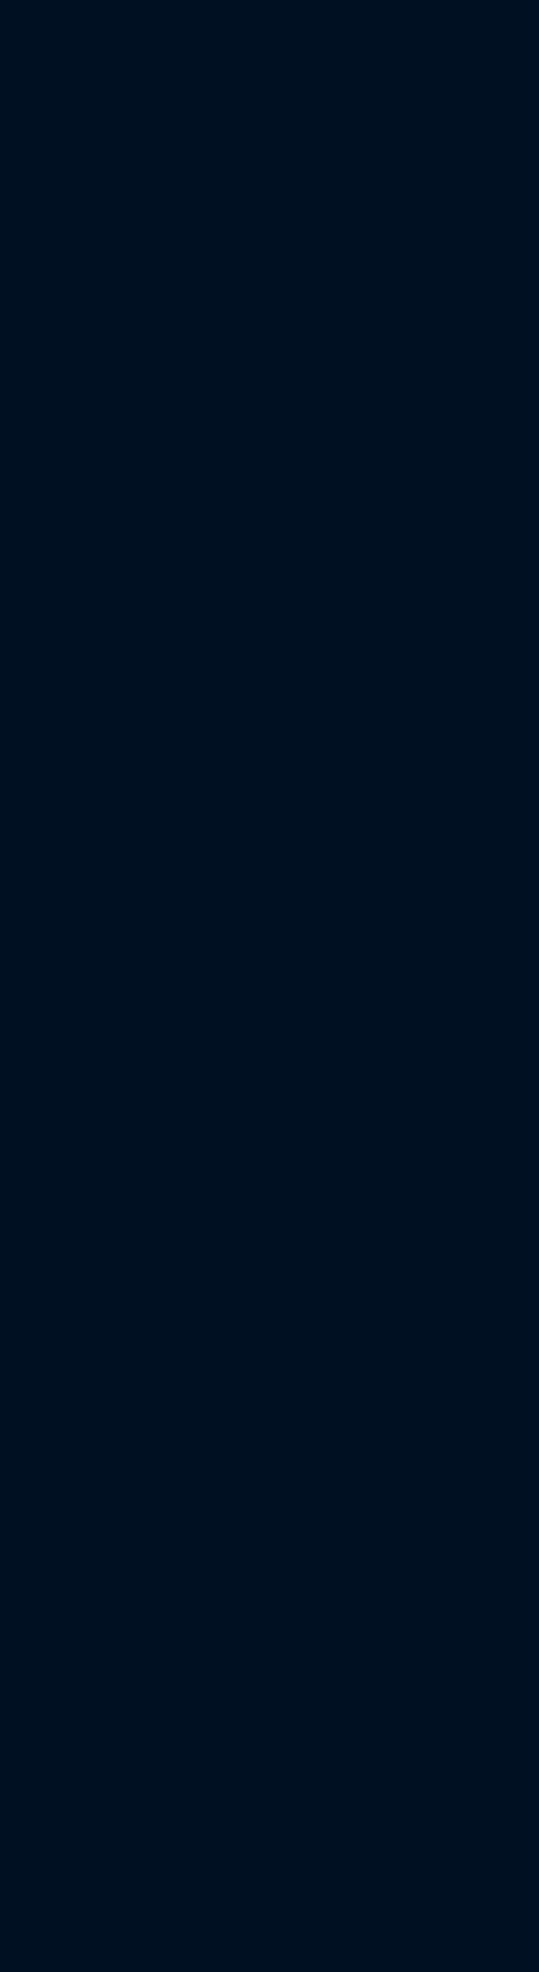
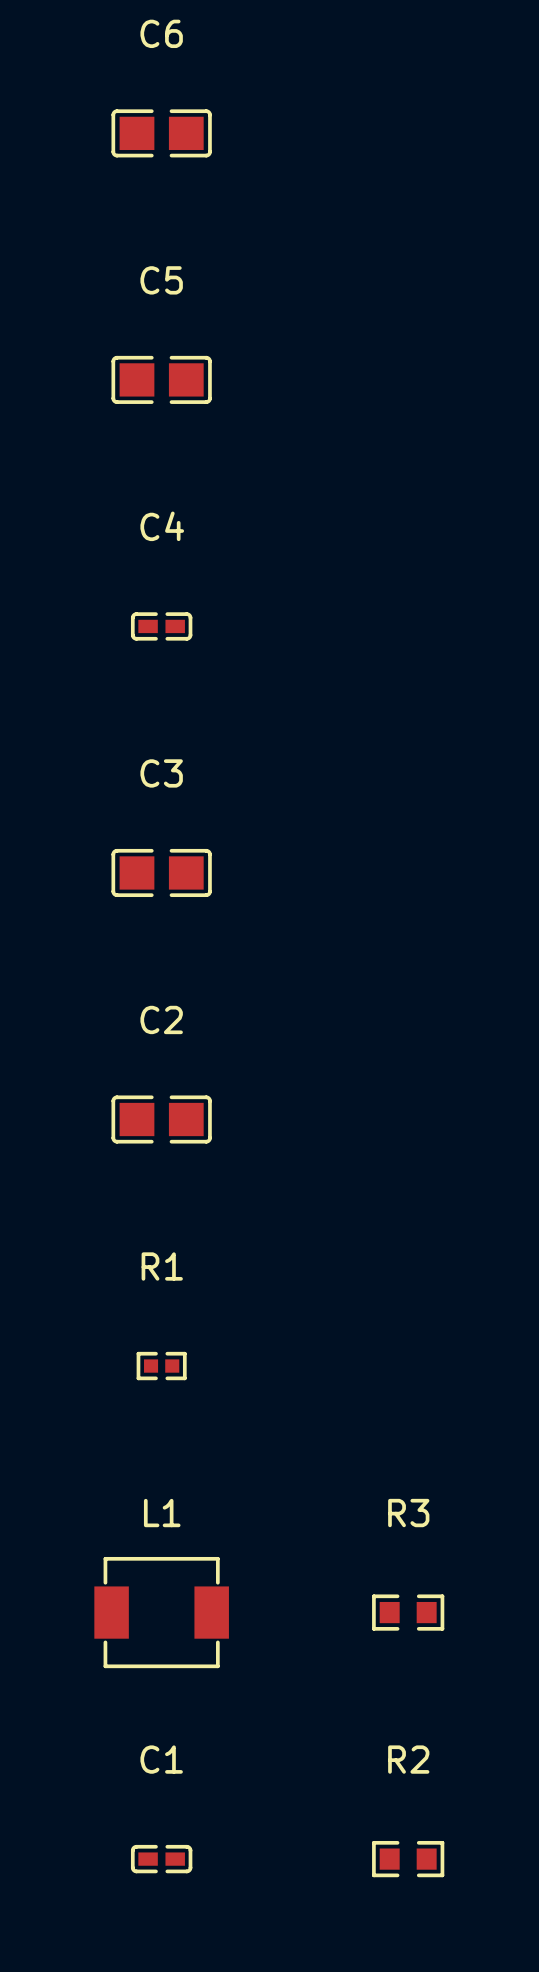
C6: none -> (161, 133)
C5: none -> (161, 379)
C4: none -> (161, 626)
C3: none -> (161, 872)
C2: none -> (161, 1119)
R1: none -> (161, 1366)
L1: none -> (161, 1612)
R3: none -> (408, 1612)
C1: none -> (161, 1859)
R2: none -> (408, 1859)

